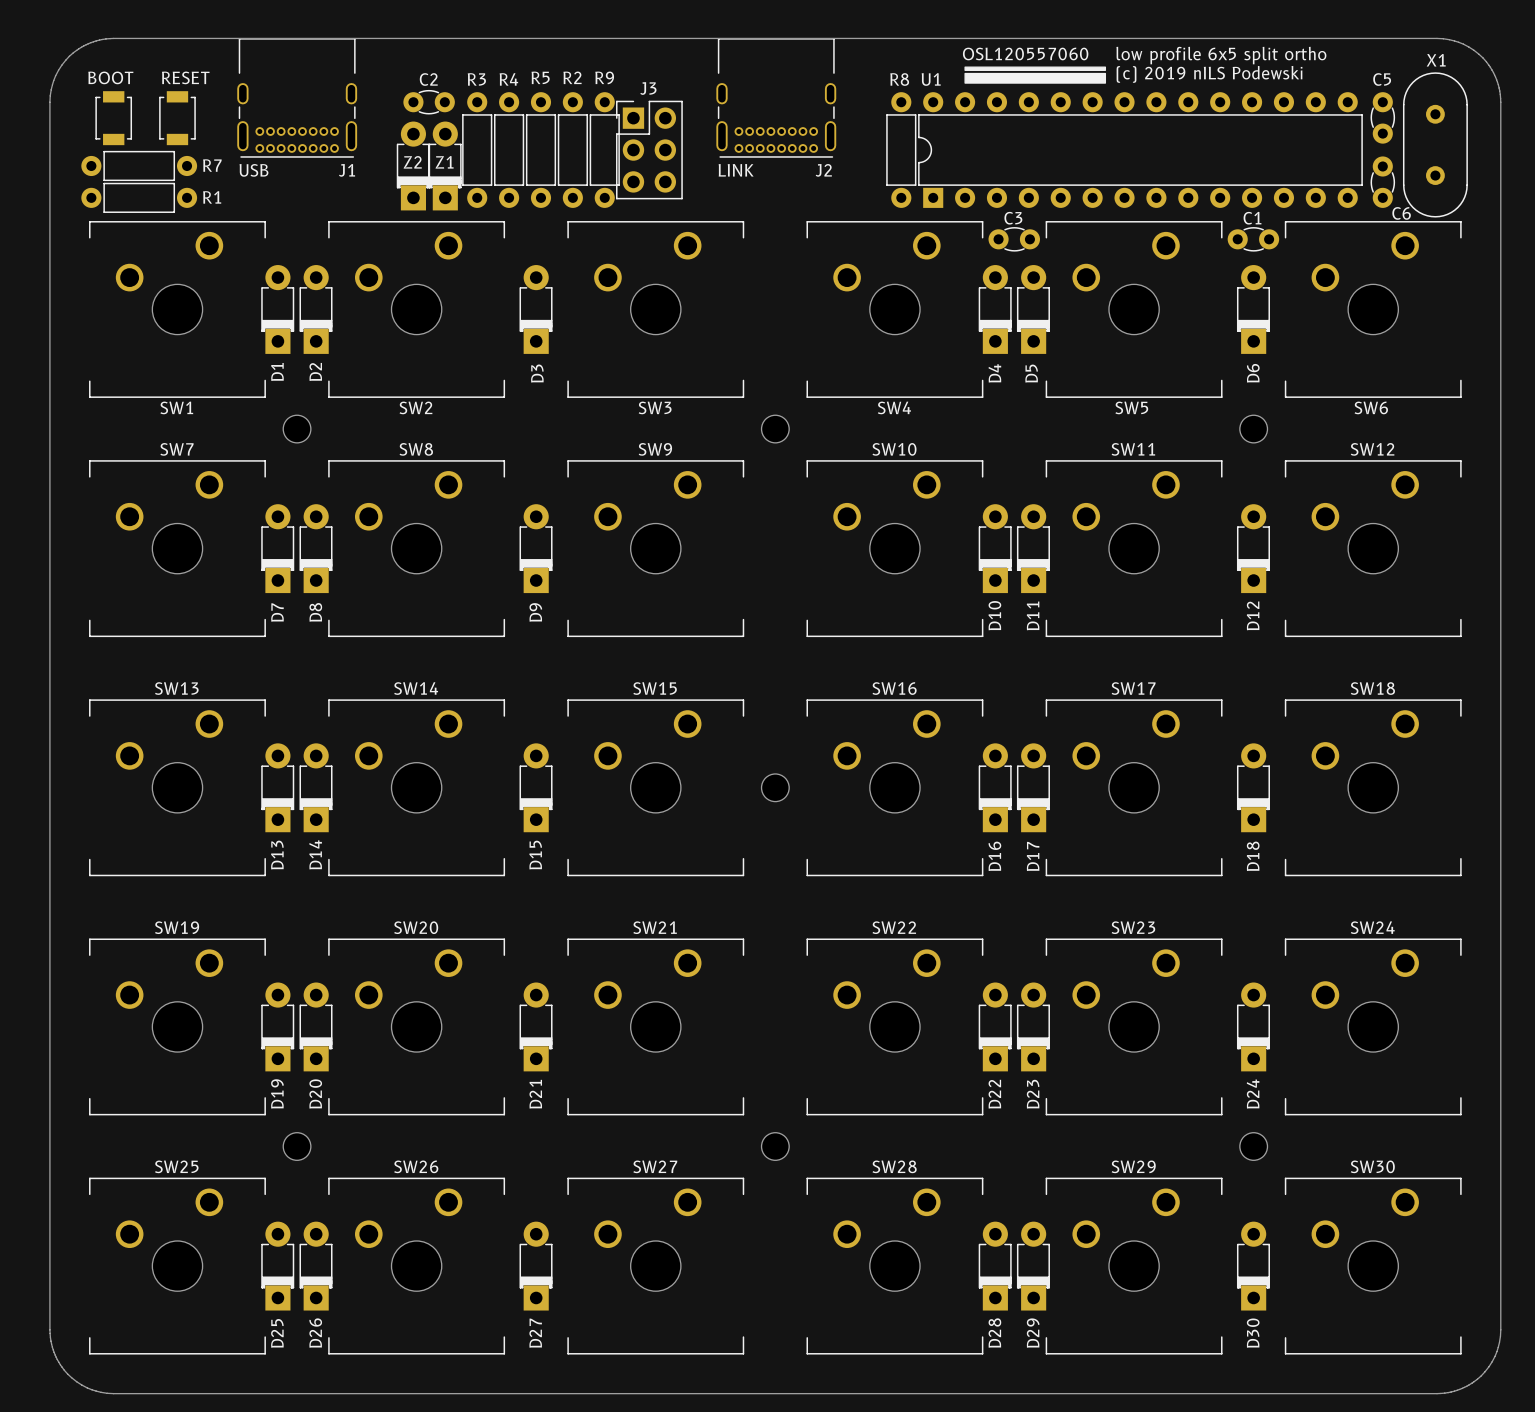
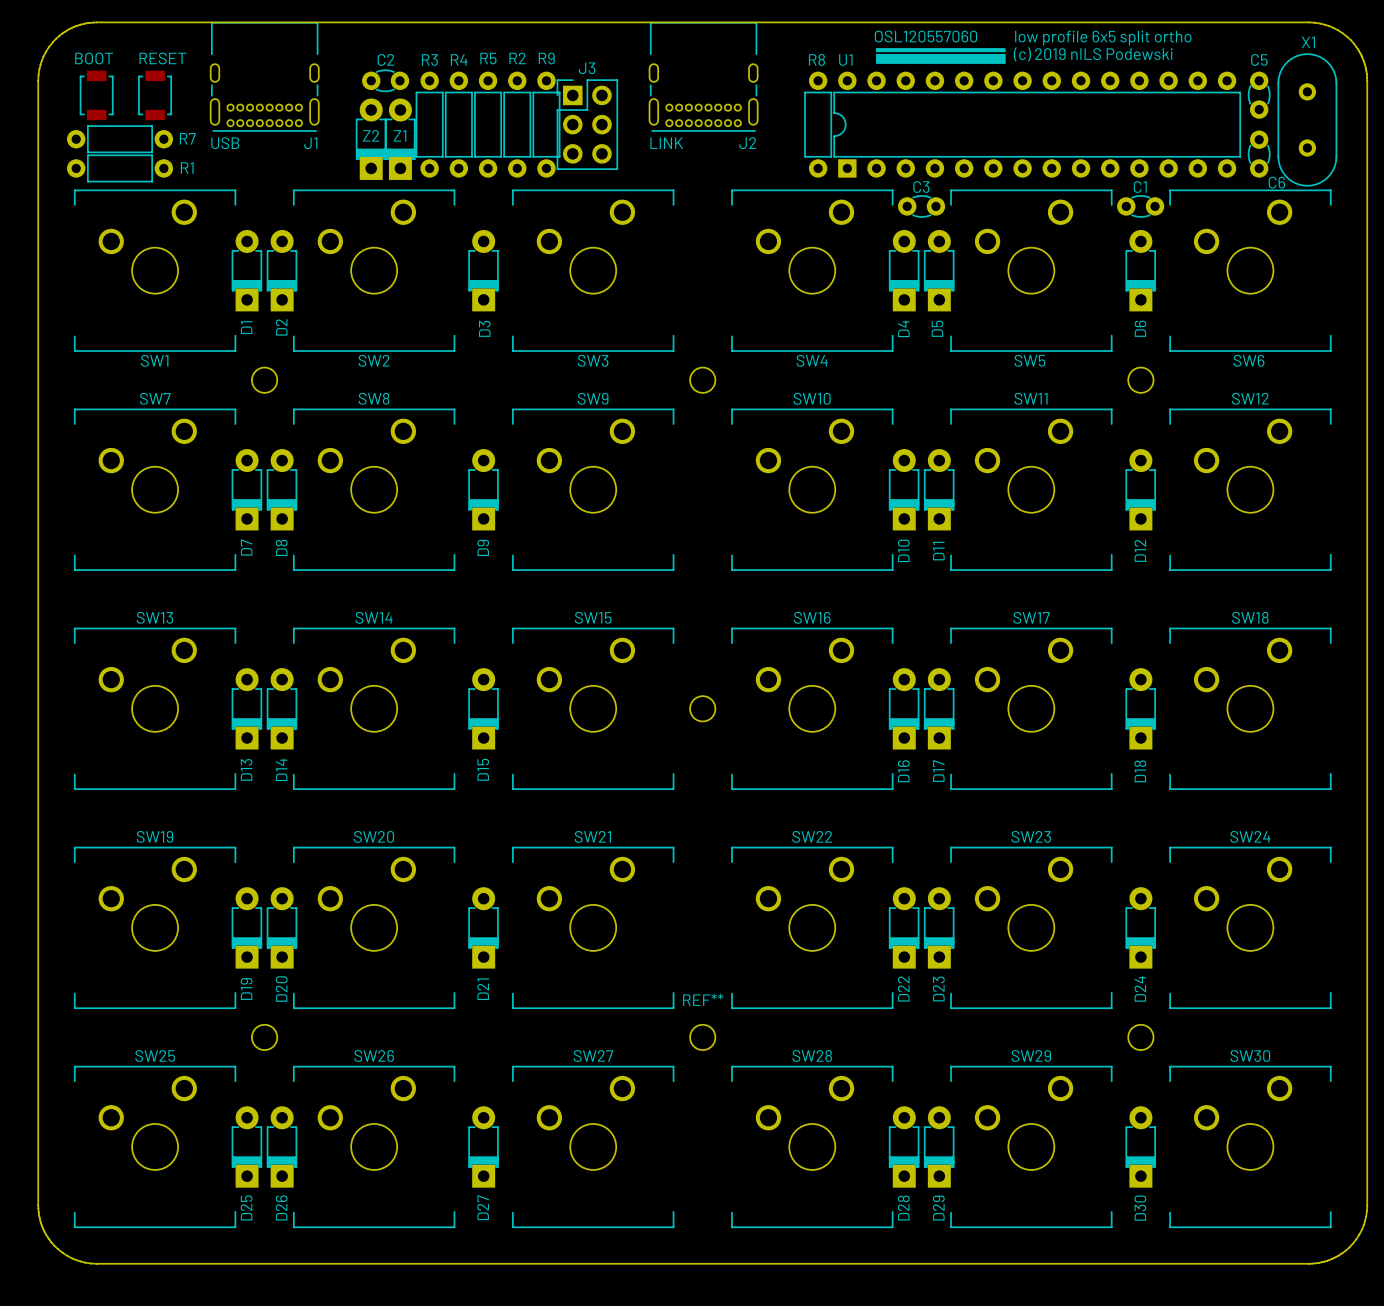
REF** name: none -> REF** (703, 999)

